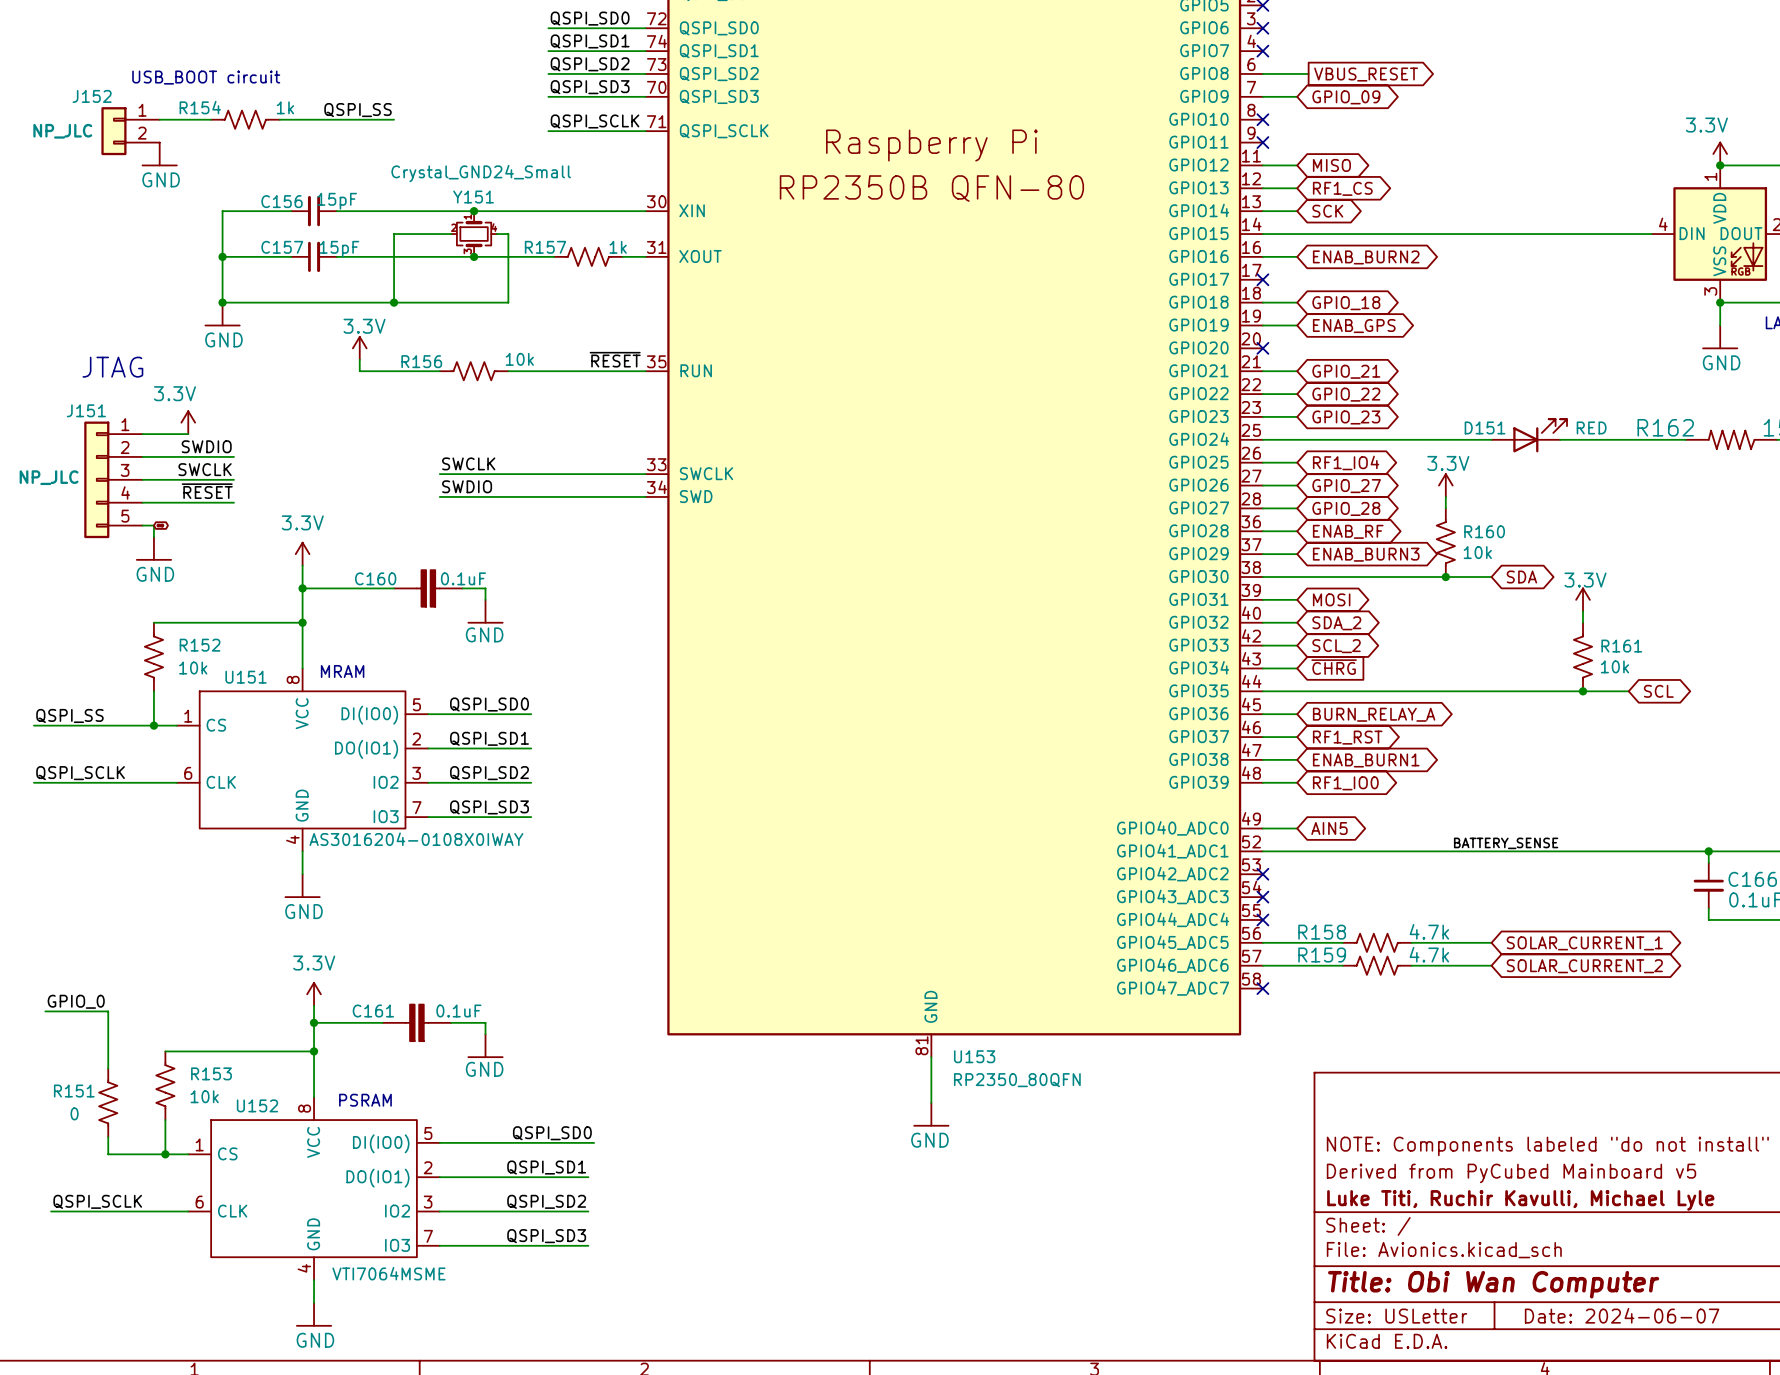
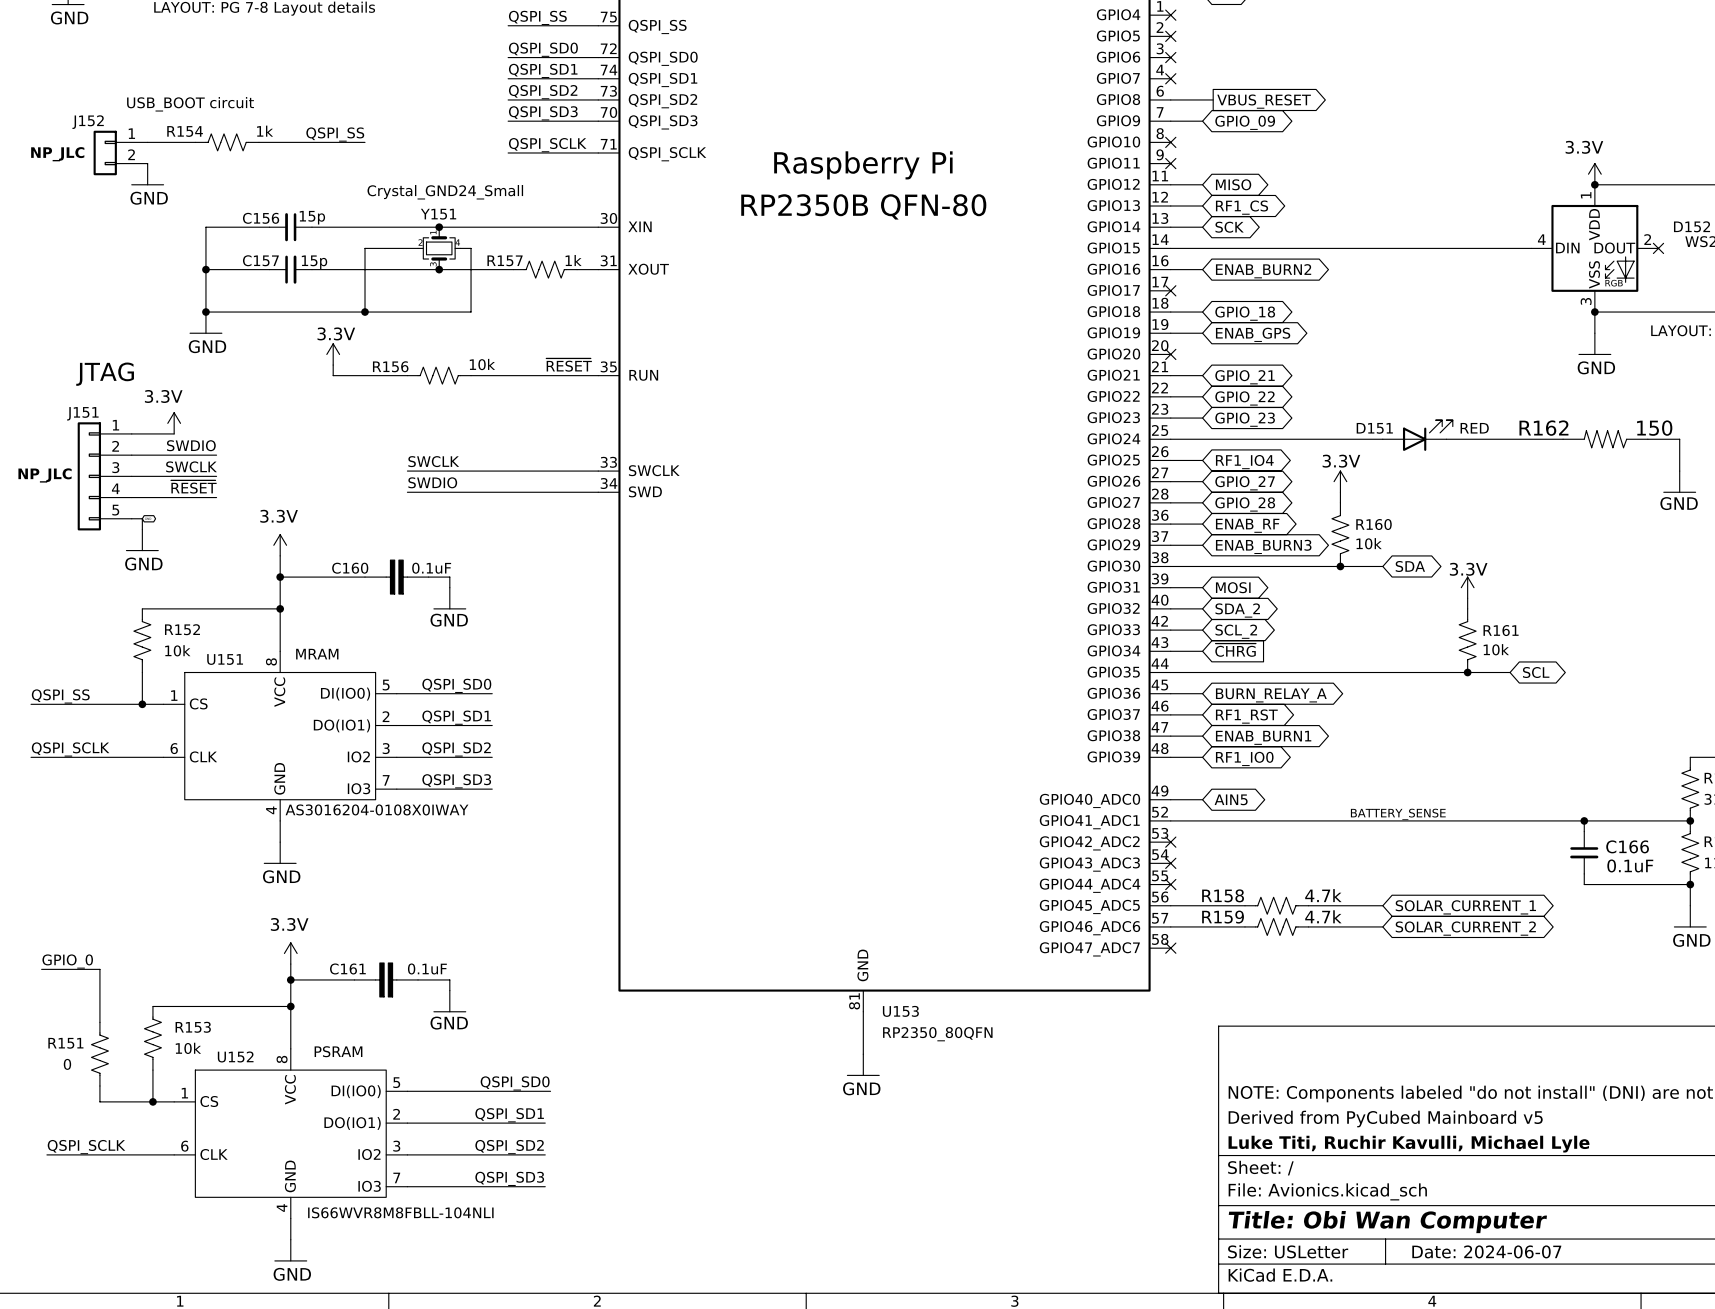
C156 value: 15pF (337, 201) -> 15p (312, 217)
C157 value: 15pF (339, 249) -> 15p (314, 262)
U152 value: VTI7064MSME (388, 1273) -> IS66WVR8M8FBLL-104NLI (400, 1212)

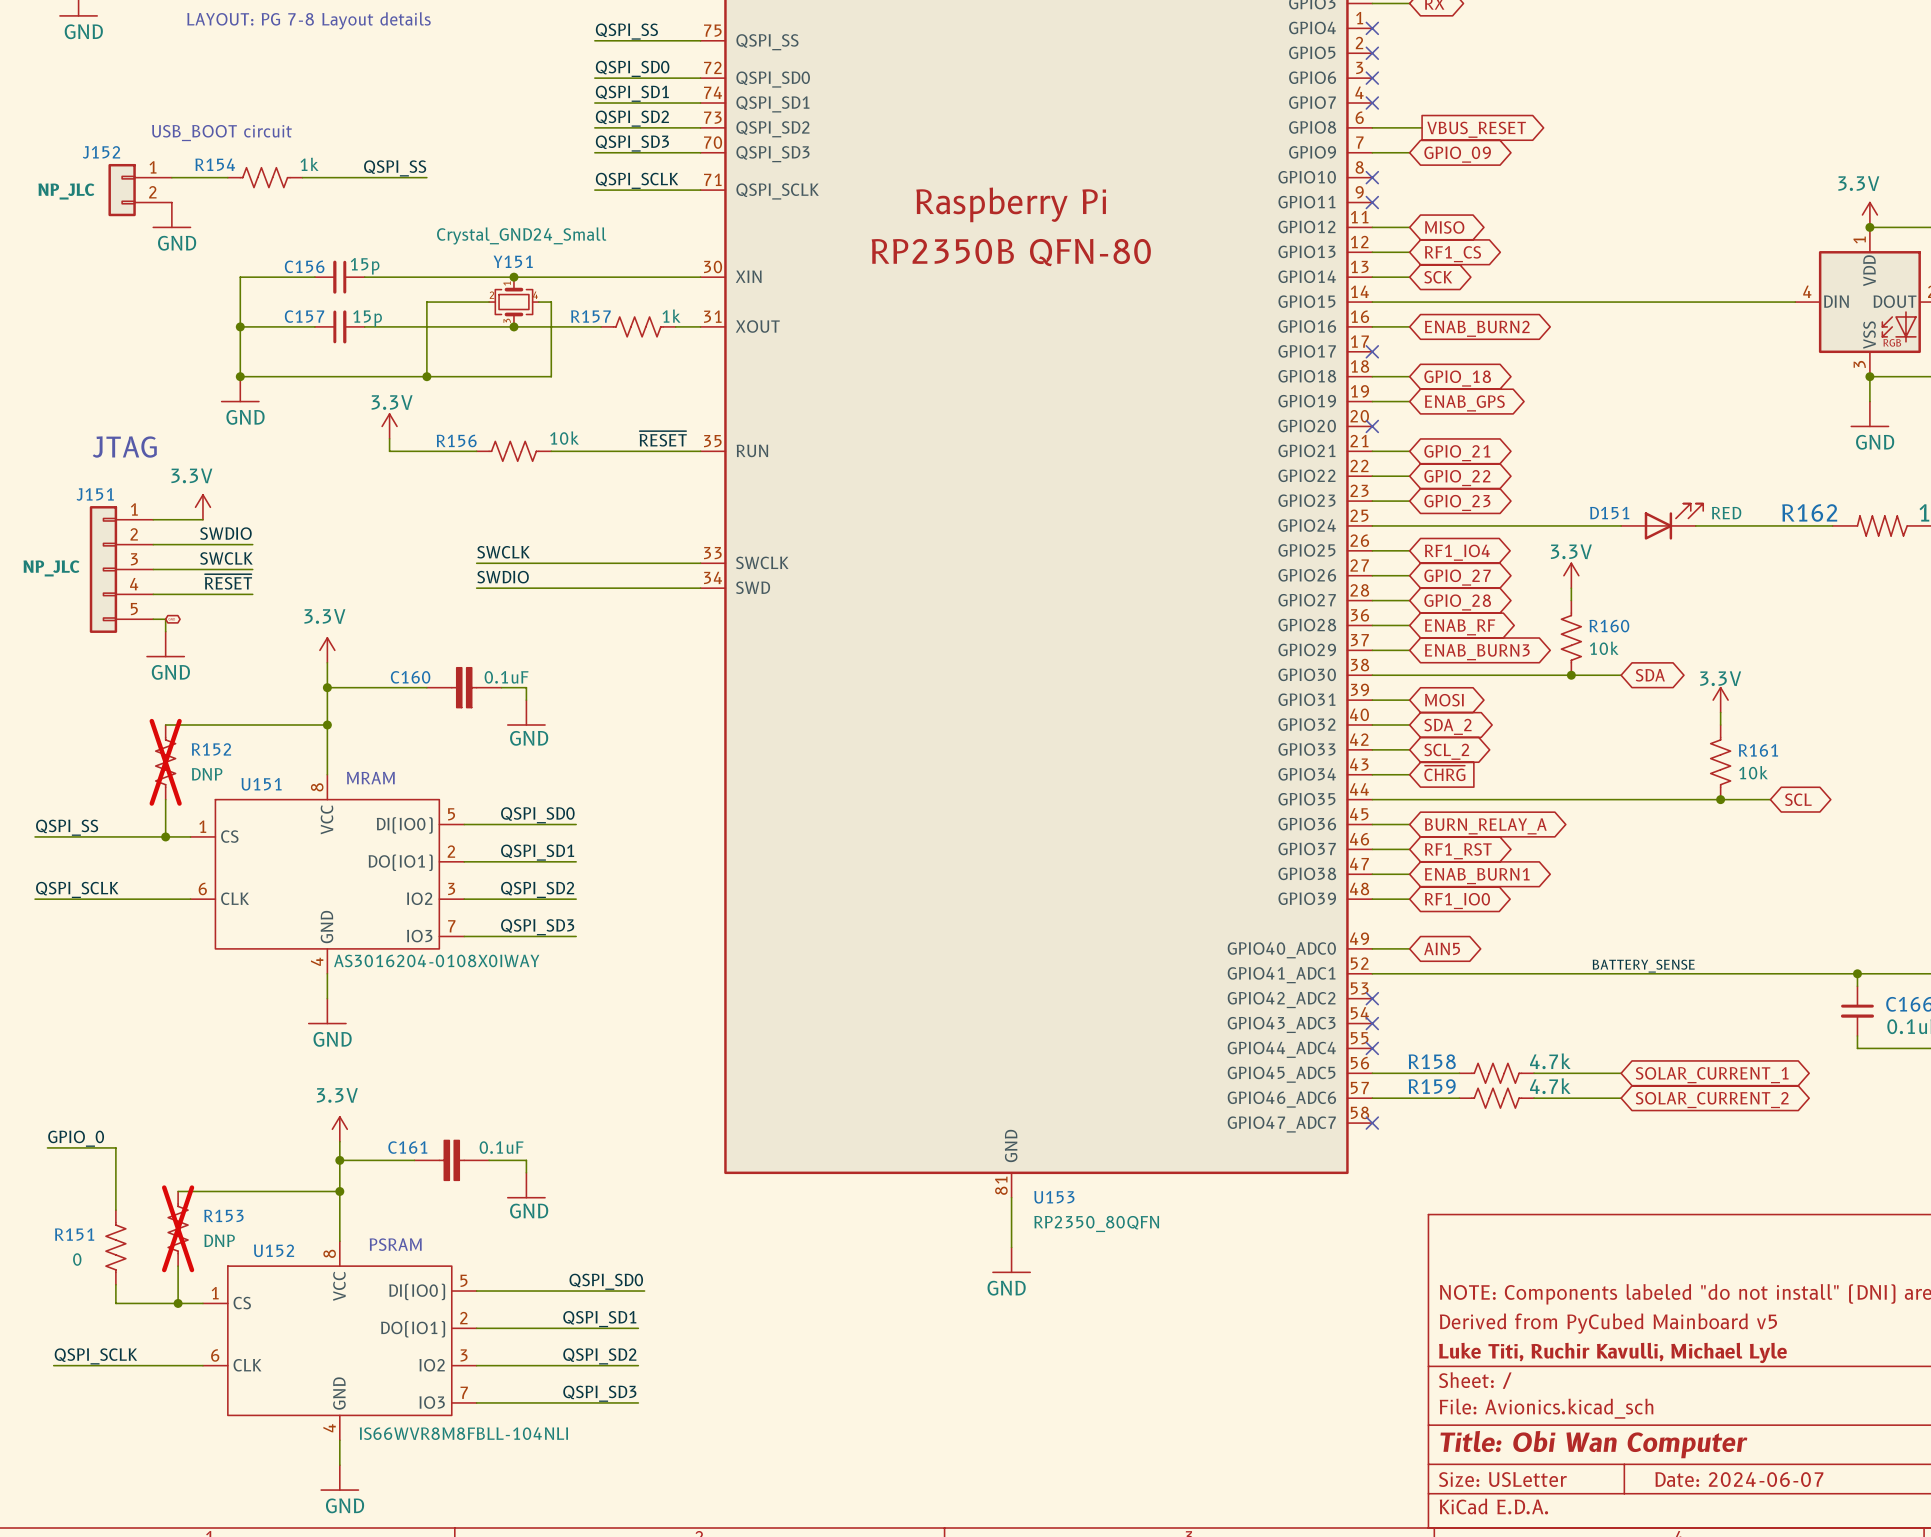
R152 do-not-place cross: none -> (165, 762)
R152 value: 10k (177, 650) -> DNP (207, 774)
R153 do-not-place cross: none -> (178, 1228)
R153 value: 10k (188, 1048) -> DNP (219, 1240)

